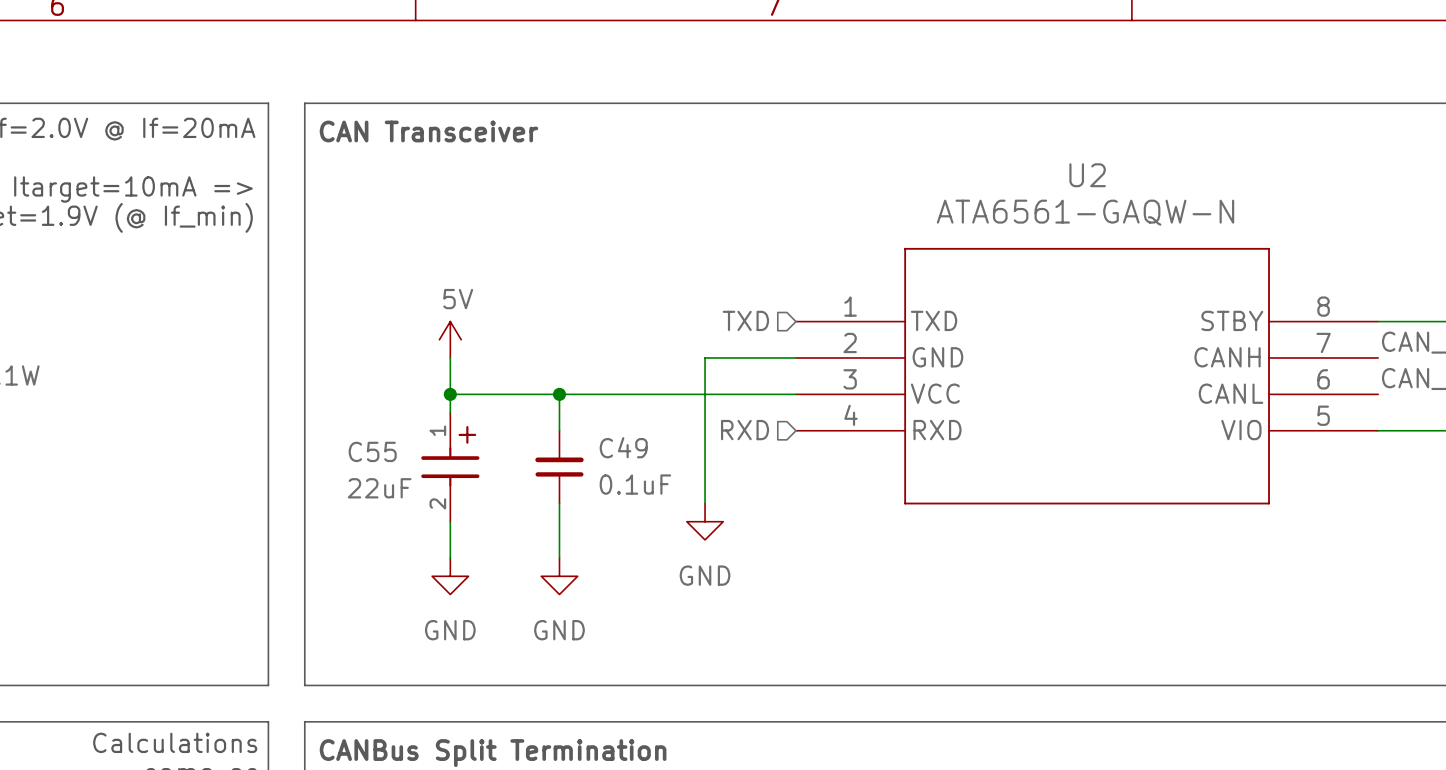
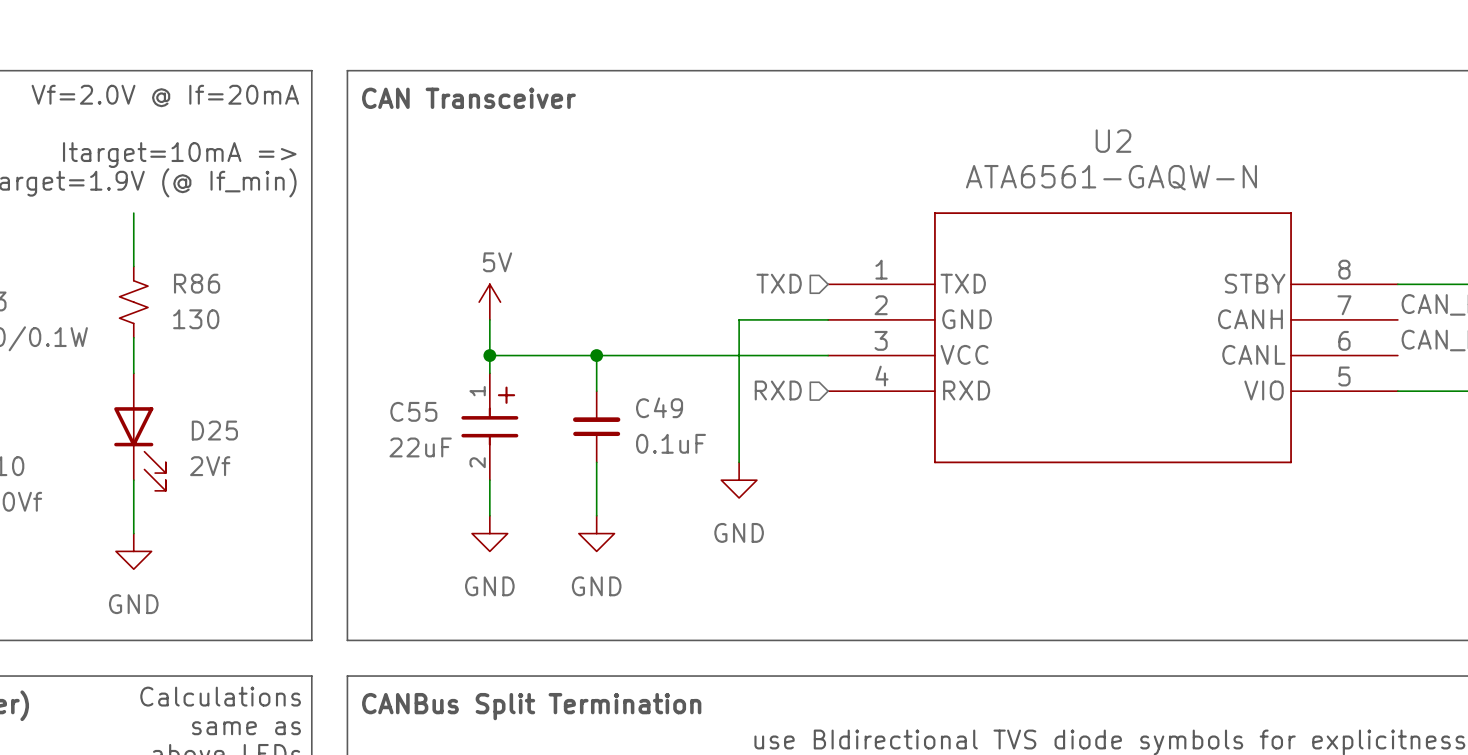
wire: none -> (133, 213) (133, 266)
R86: none -> 130 (133, 302)
wire: none -> (133, 337) (133, 373)
D25: none -> 2Vf (140, 432)
wire: none -> (133, 480) (133, 533)
power symbol: none -> GND (133, 551)

